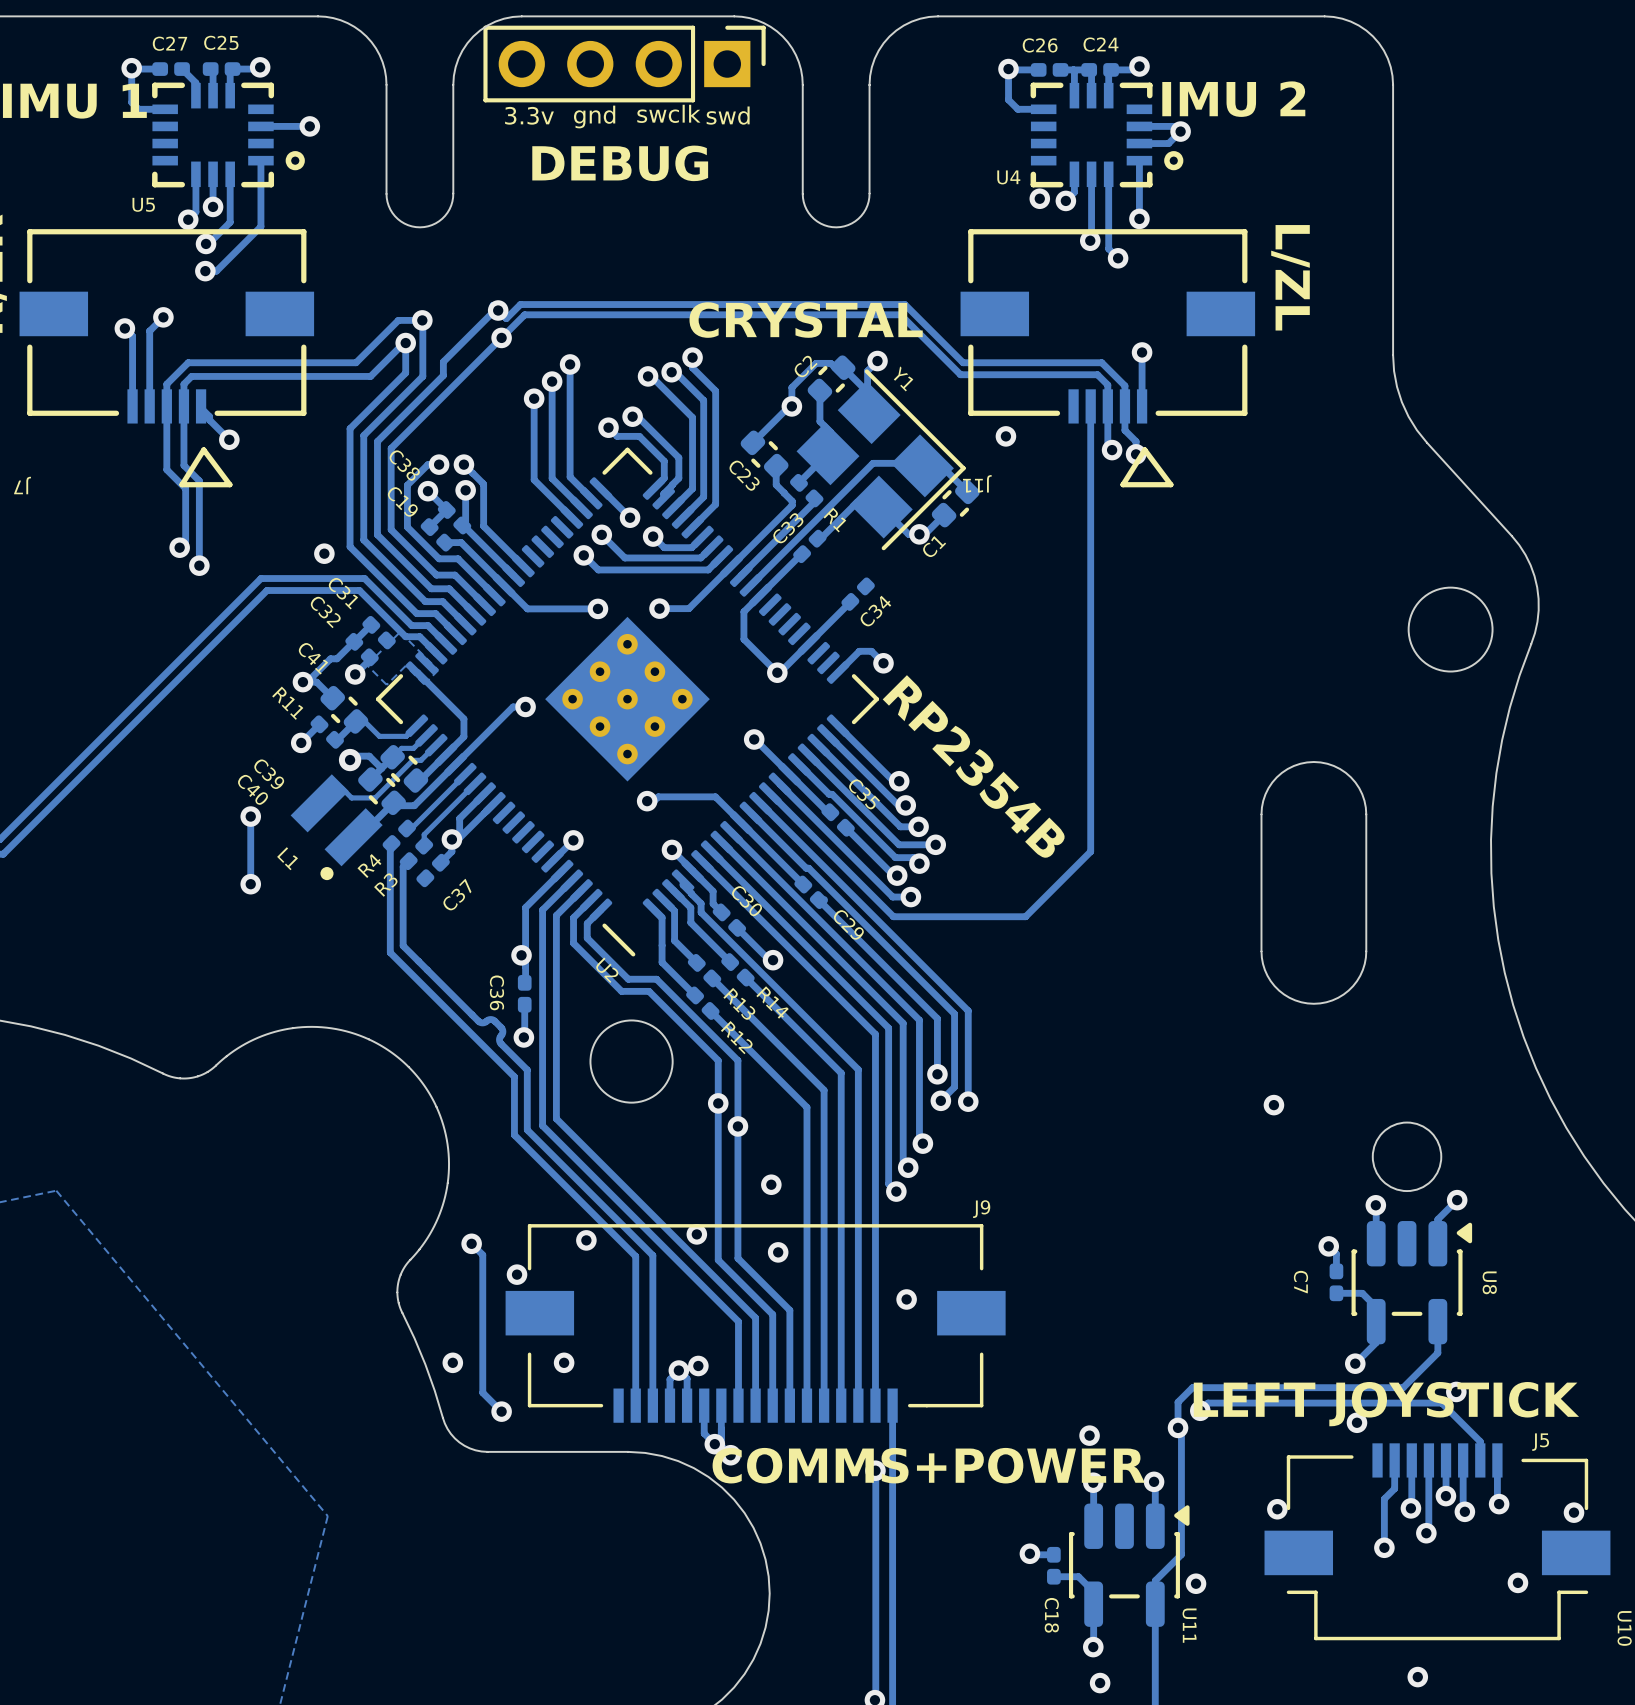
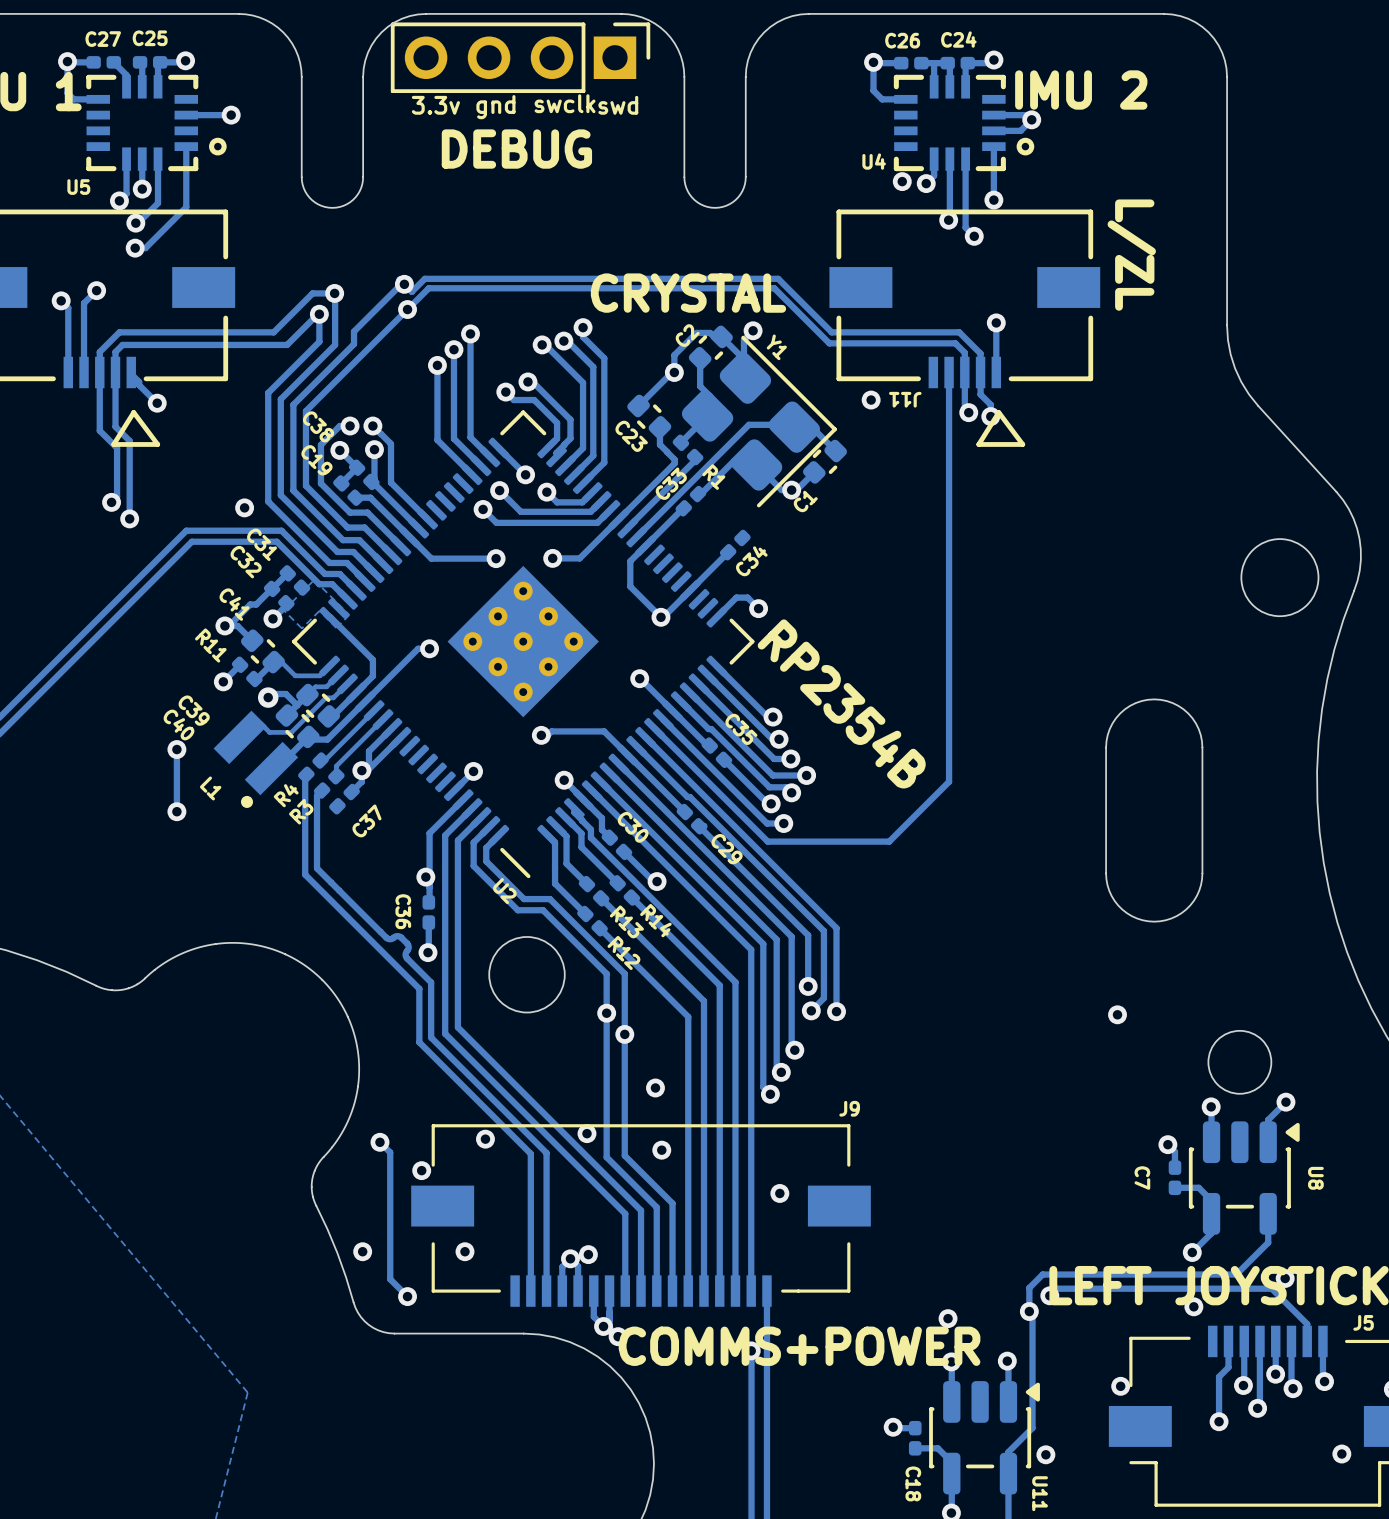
Y1 footprint: [796, 369, 966, 551] -> [681, 335, 837, 508]
J11 name position: J11 (977, 483) -> J11 (905, 399)

